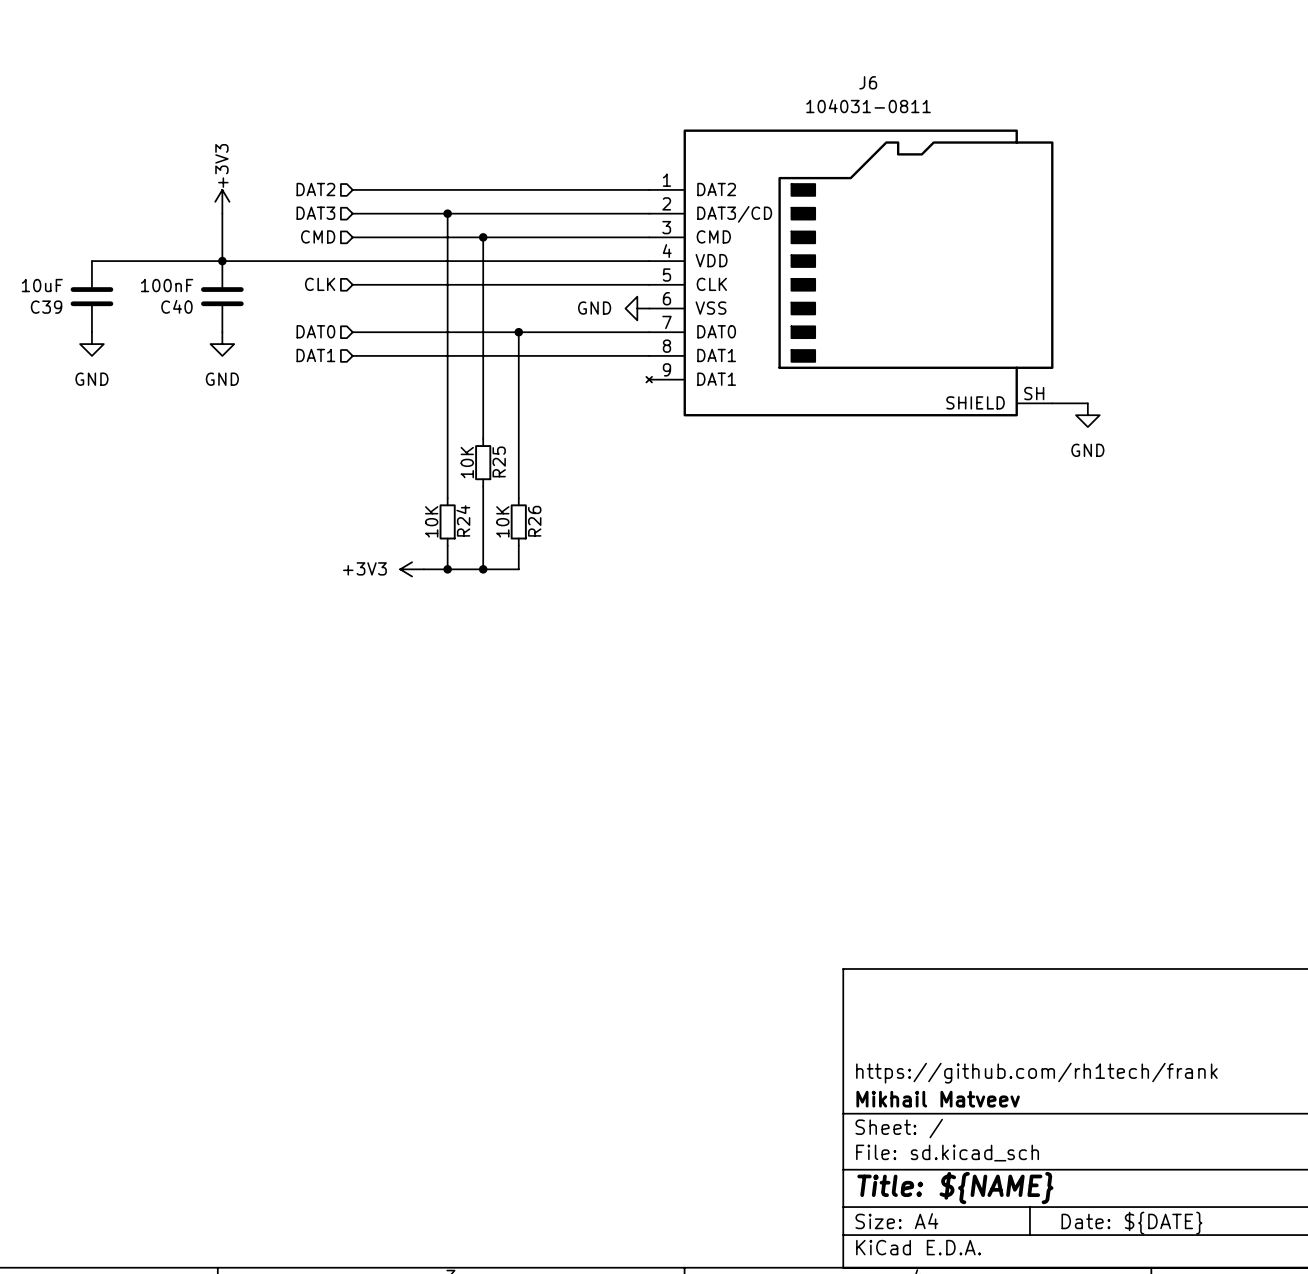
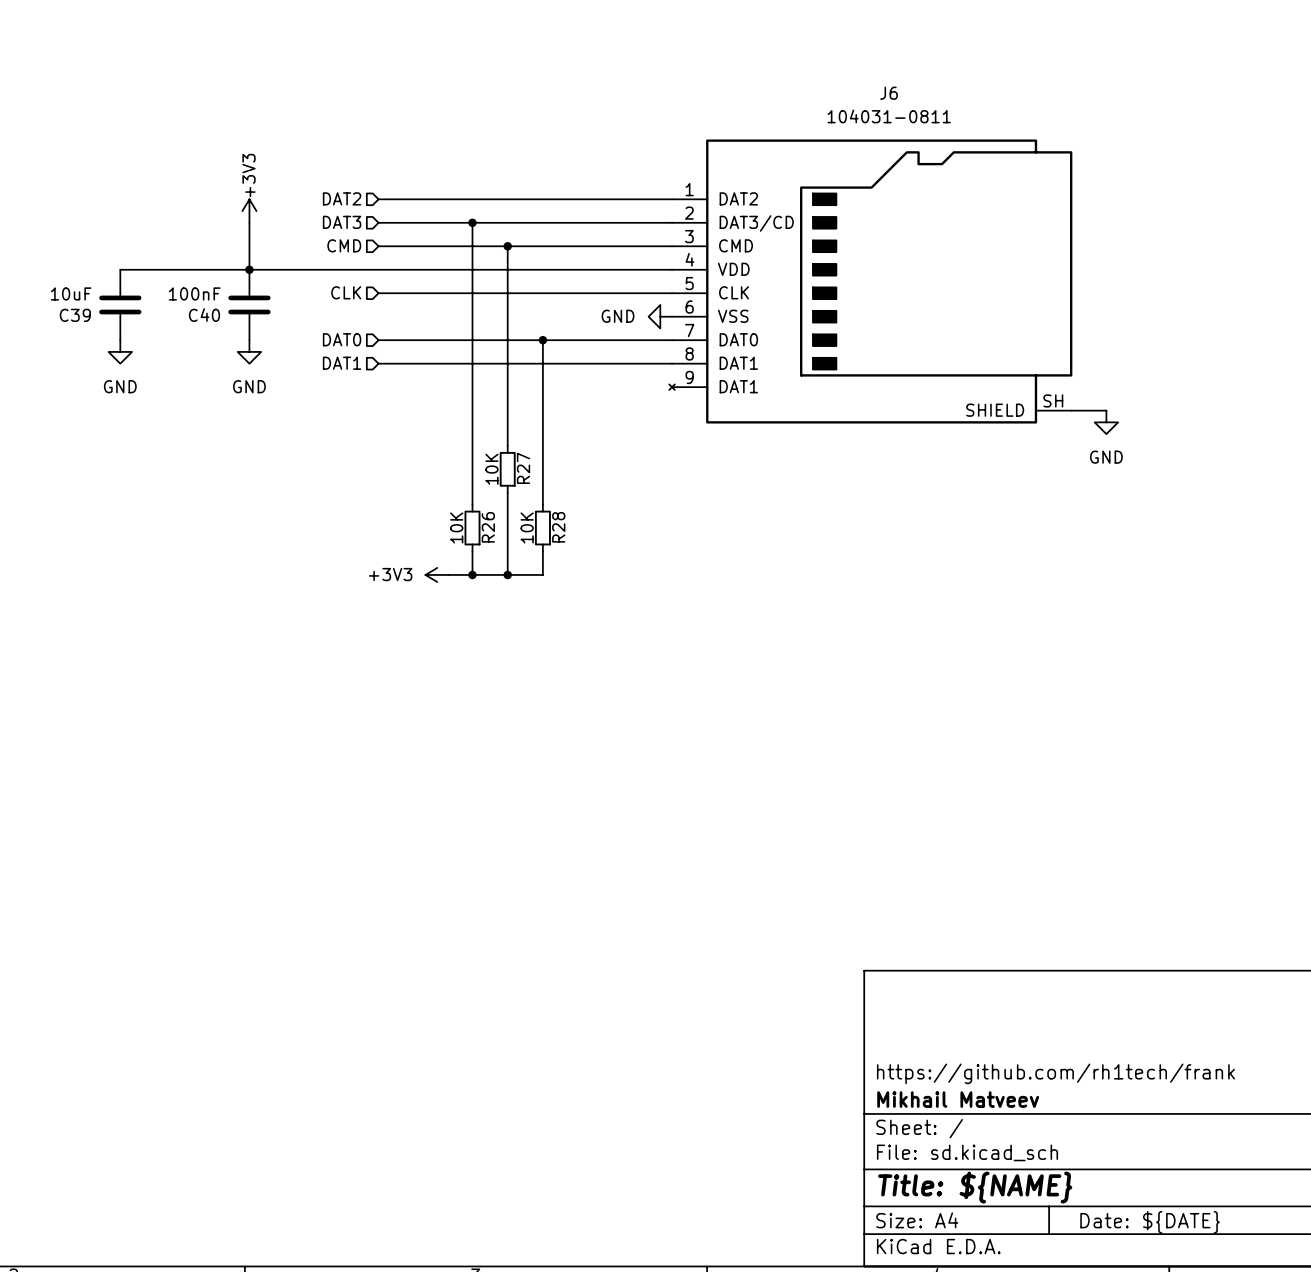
R25 name: R25 (499, 461) -> R27 (523, 468)
R24 name: R24 (463, 520) -> R26 (488, 527)
R26 name: R26 (534, 521) -> R28 (558, 527)

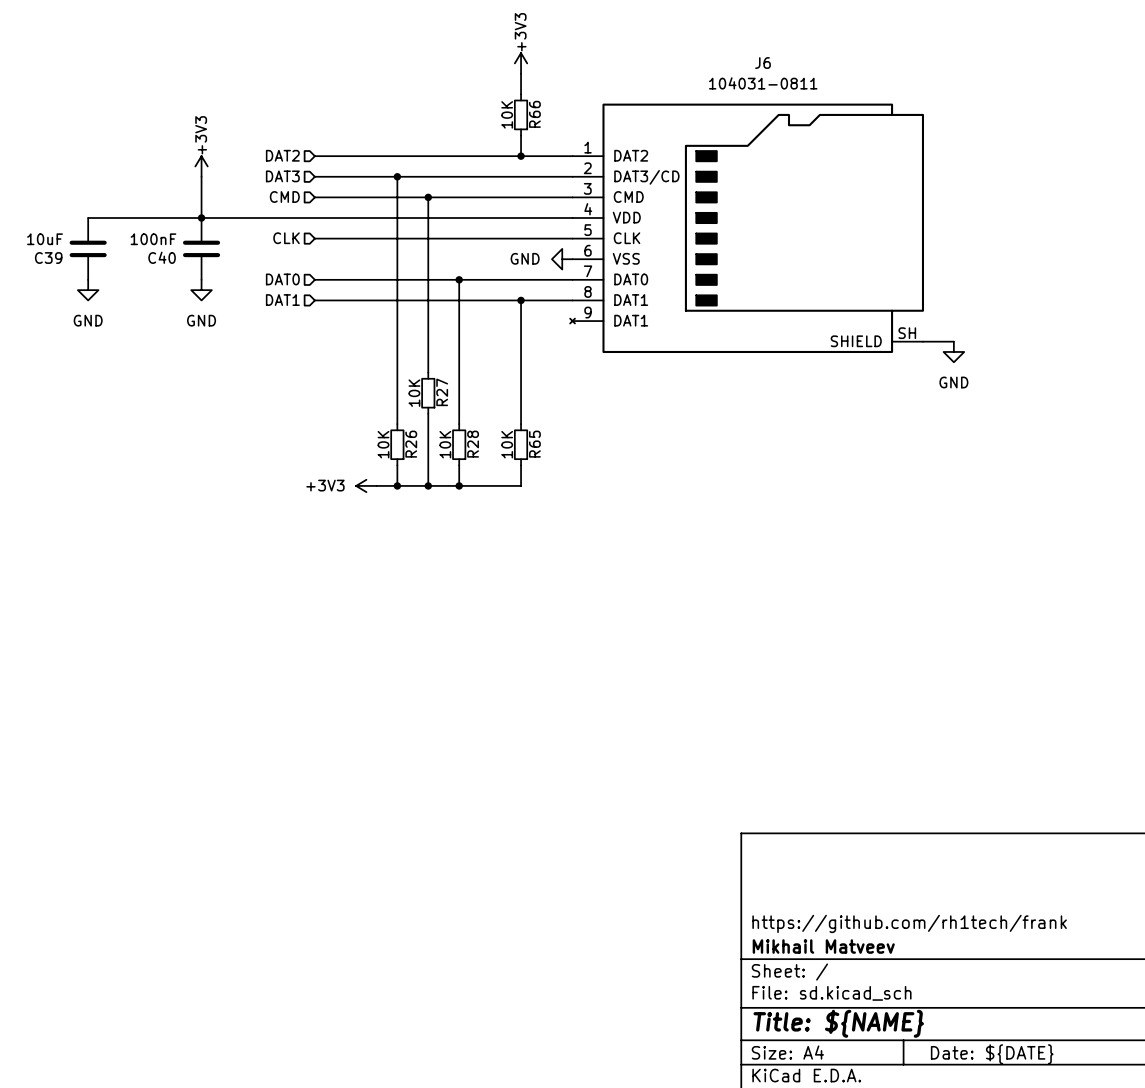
power symbol: none -> +3V3 (521, 63)
wire: none -> (521, 73) (521, 94)
R66: none -> 10K (521, 114)
wire: none -> (521, 135) (521, 156)
junction: none -> (521, 156)
wire: none -> (521, 300) (521, 424)
junction: none -> (521, 300)
R65: none -> 10K (521, 444)
wire: none -> (521, 465) (521, 485) (459, 485)
junction: none -> (459, 485)

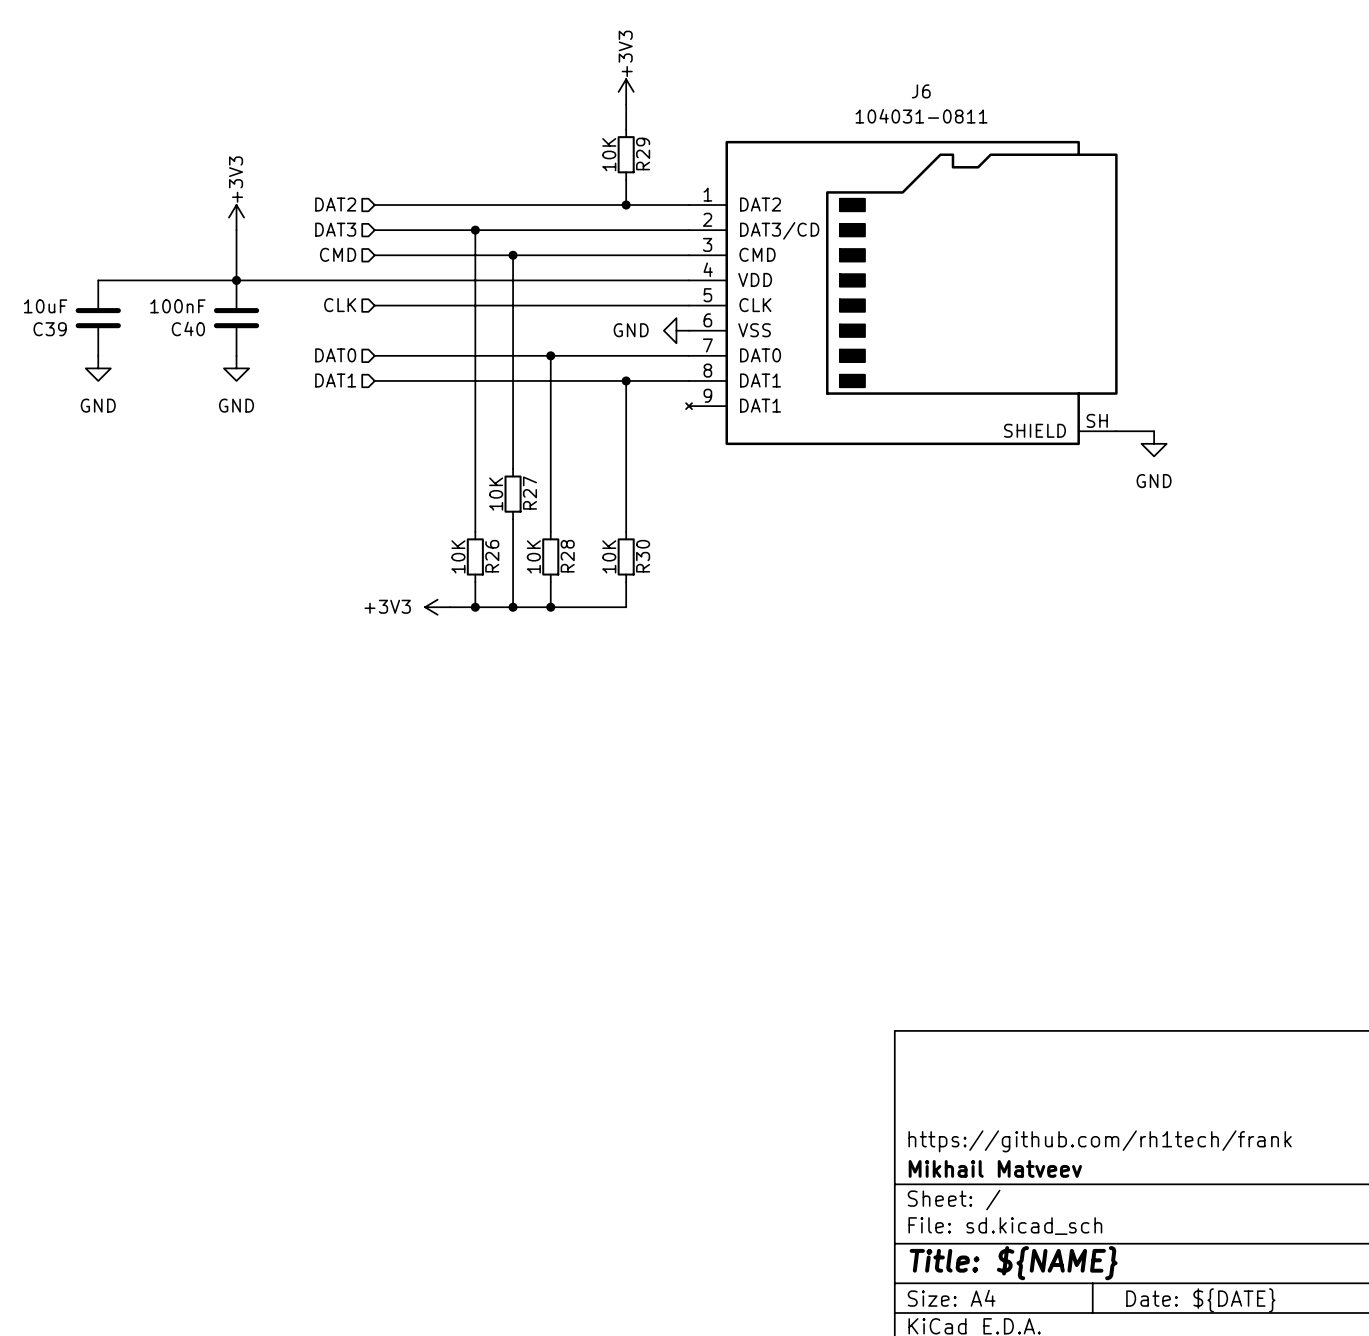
R66 name: R66 (534, 114) -> R29 (643, 154)
R65 name: R65 (534, 444) -> R30 (643, 556)

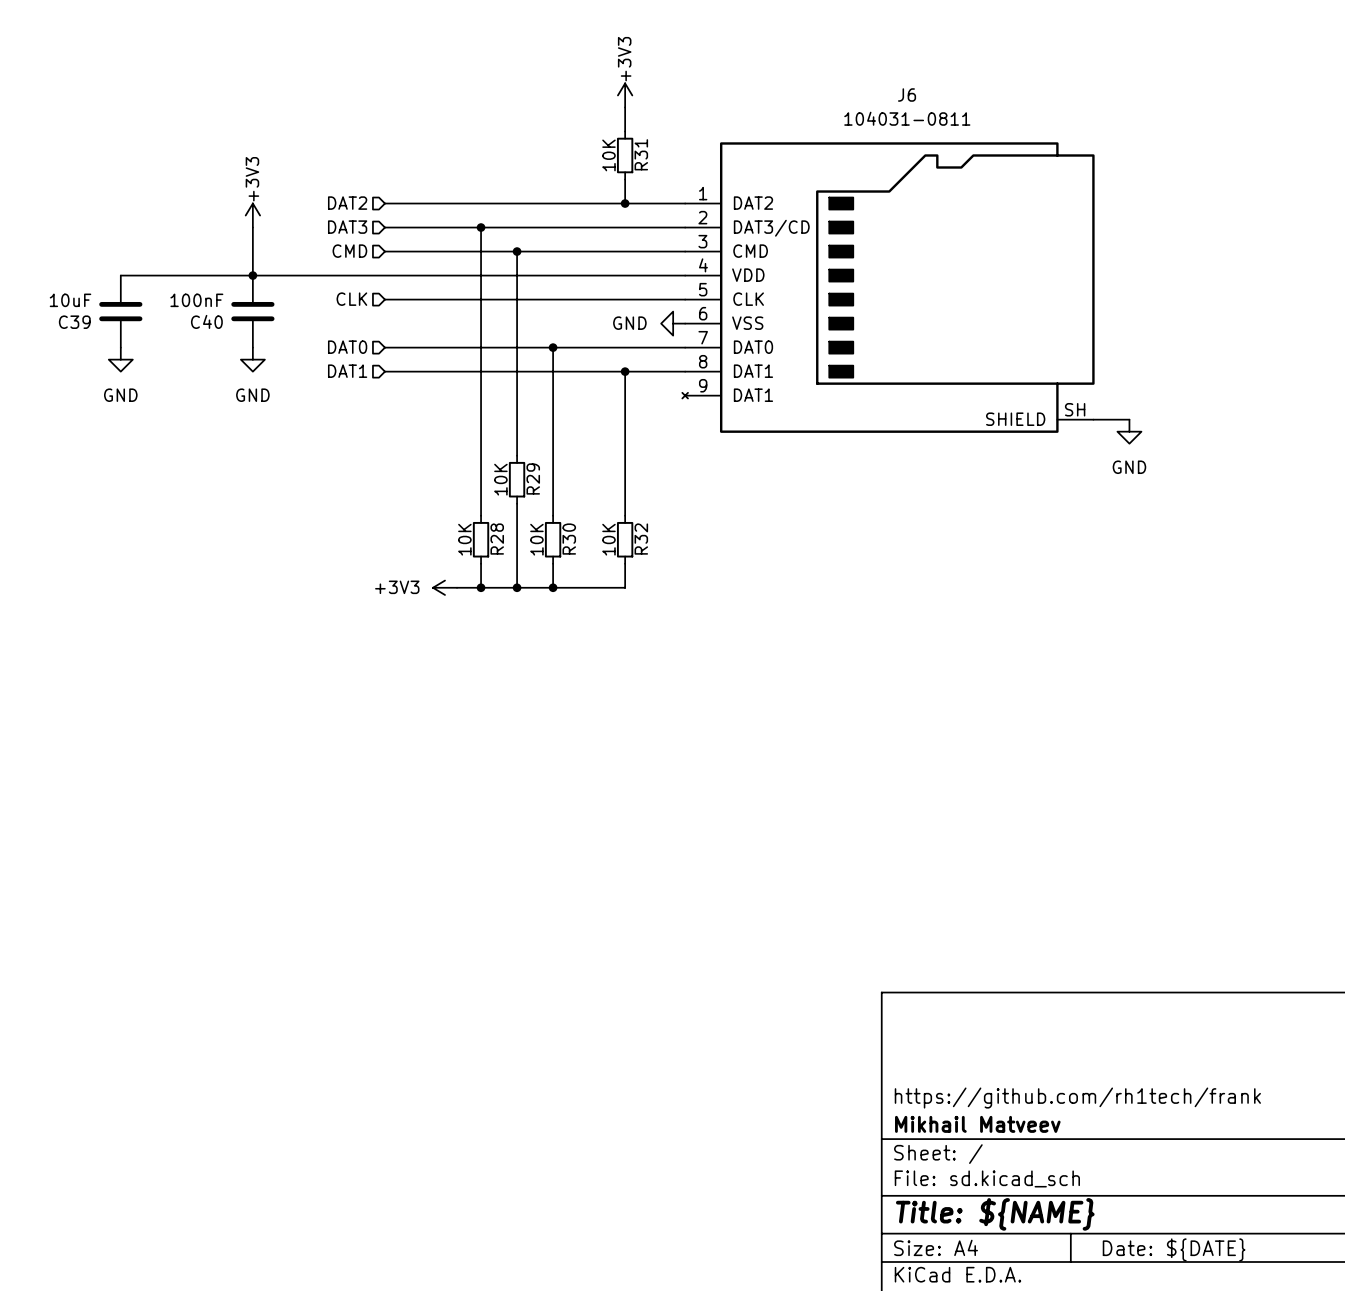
R29 name: R29 (643, 154) -> R31 (641, 154)
R27 name: R27 (529, 493) -> R29 (533, 479)
R26 name: R26 (492, 556) -> R28 (497, 539)
R28 name: R28 (567, 556) -> R30 (569, 539)
R30 name: R30 (643, 556) -> R32 (641, 539)

